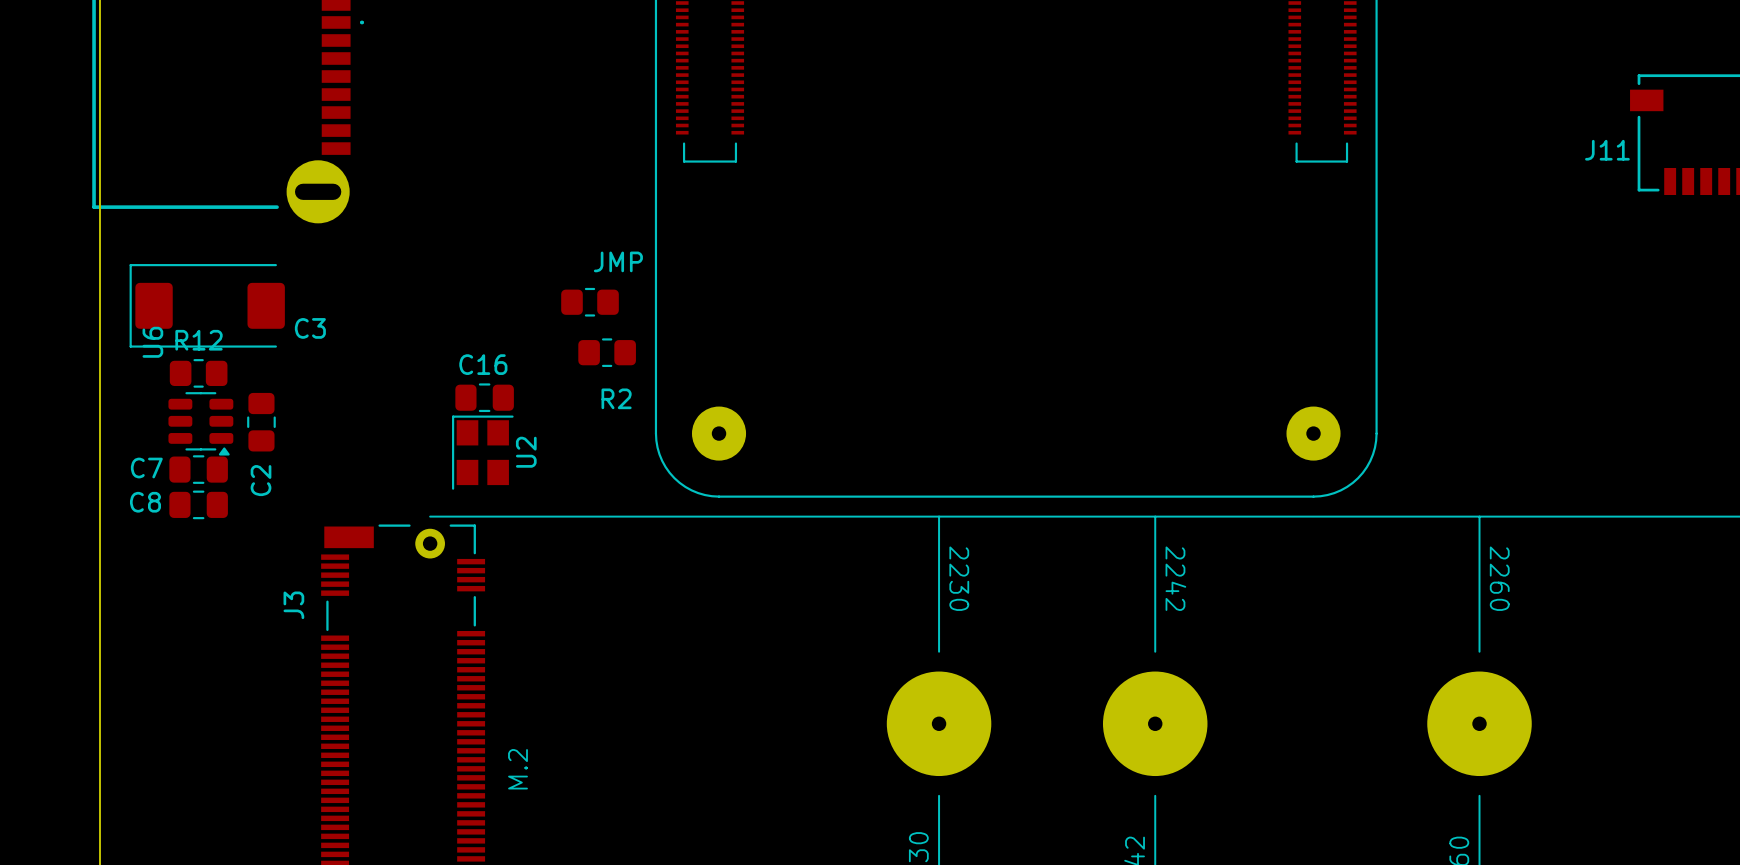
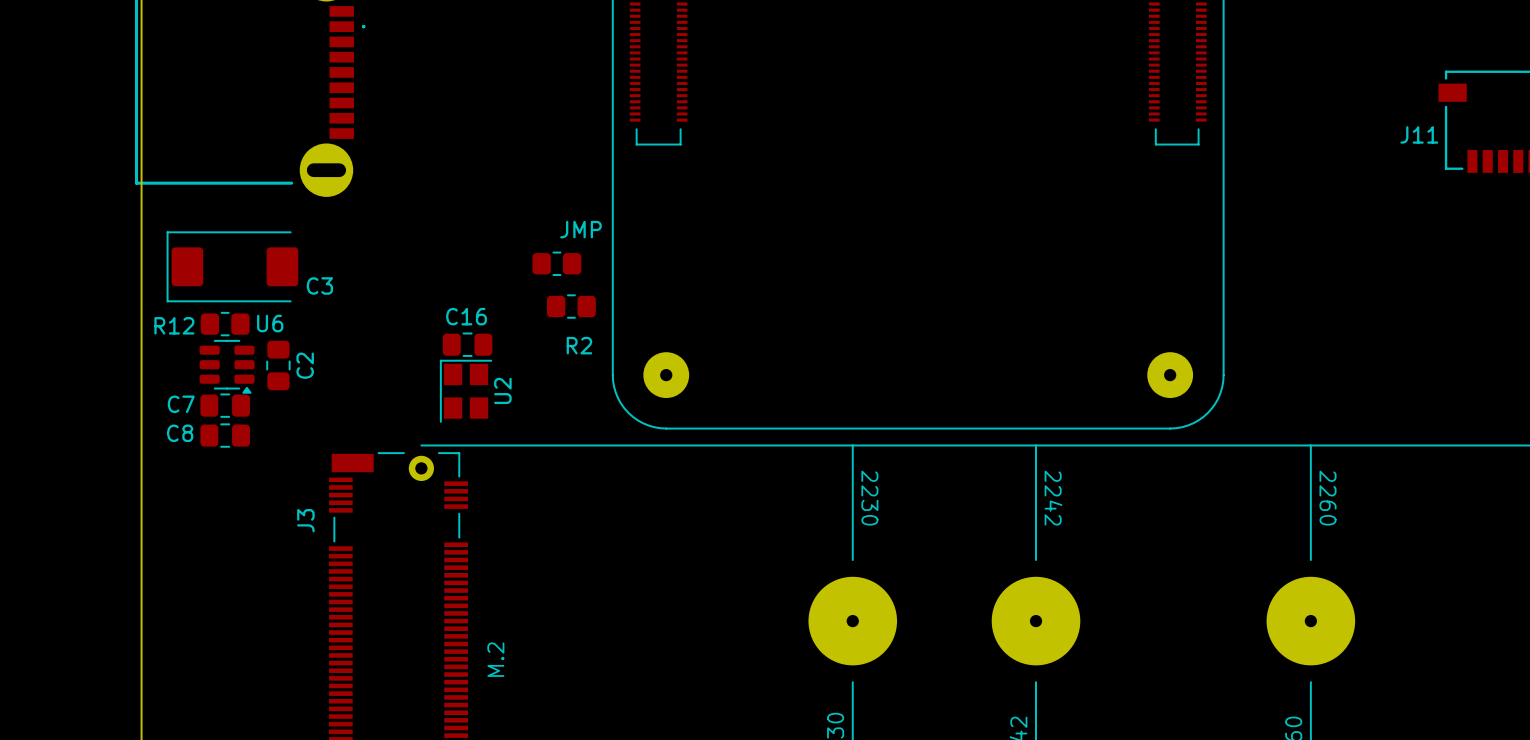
R12 name position: R12 (199, 340) -> R12 (174, 325)
U6 name rotation: 0° (152, 342) -> 90° clockwise (270, 323)
U6 name position: U6 (152, 342) -> U6 (270, 323)
C2 name position: C2 (261, 480) -> C2 (305, 365)

